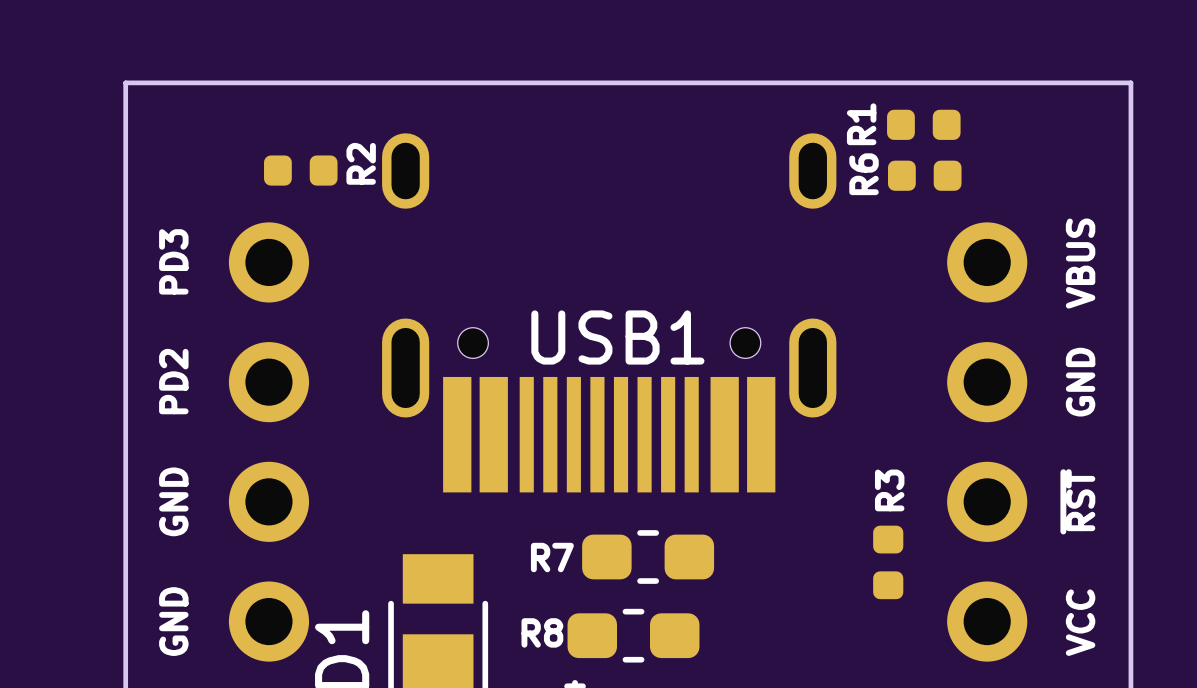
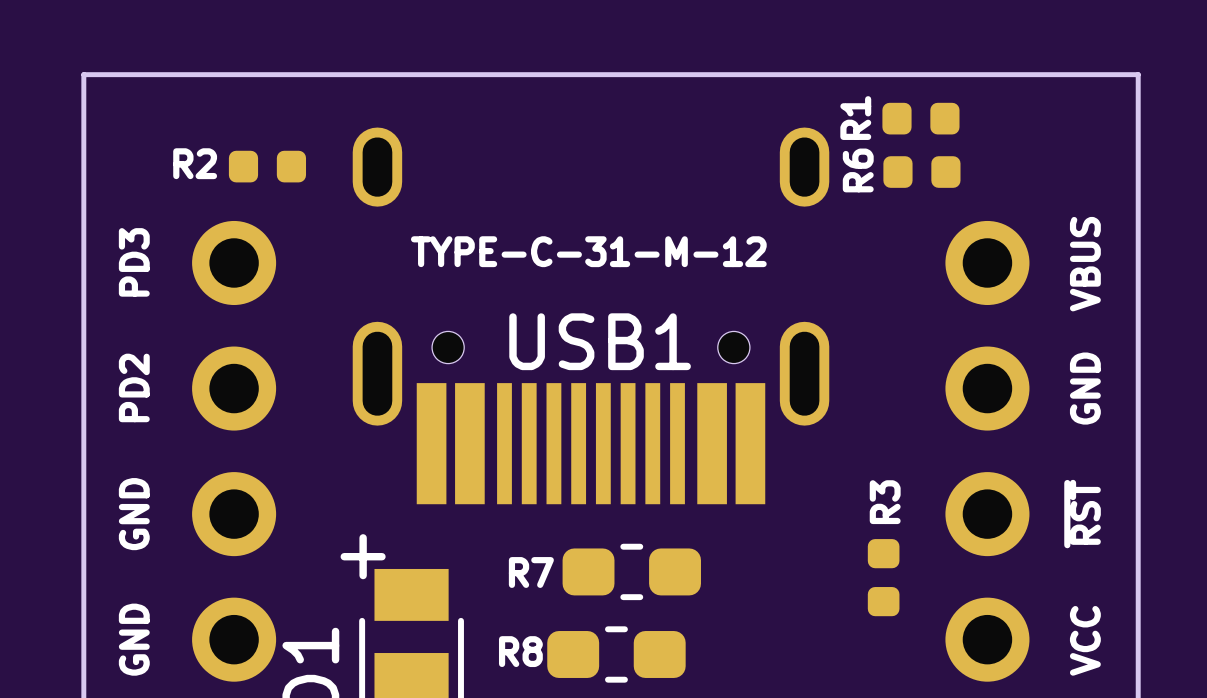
R2 name rotation: 0° (361, 163) -> 90° clockwise (195, 163)
R2 name position: R2 (361, 163) -> R2 (195, 163)
USB1 value: none -> TYPE-C-31-M-12 (588, 251)
text: none -> + (363, 556)

